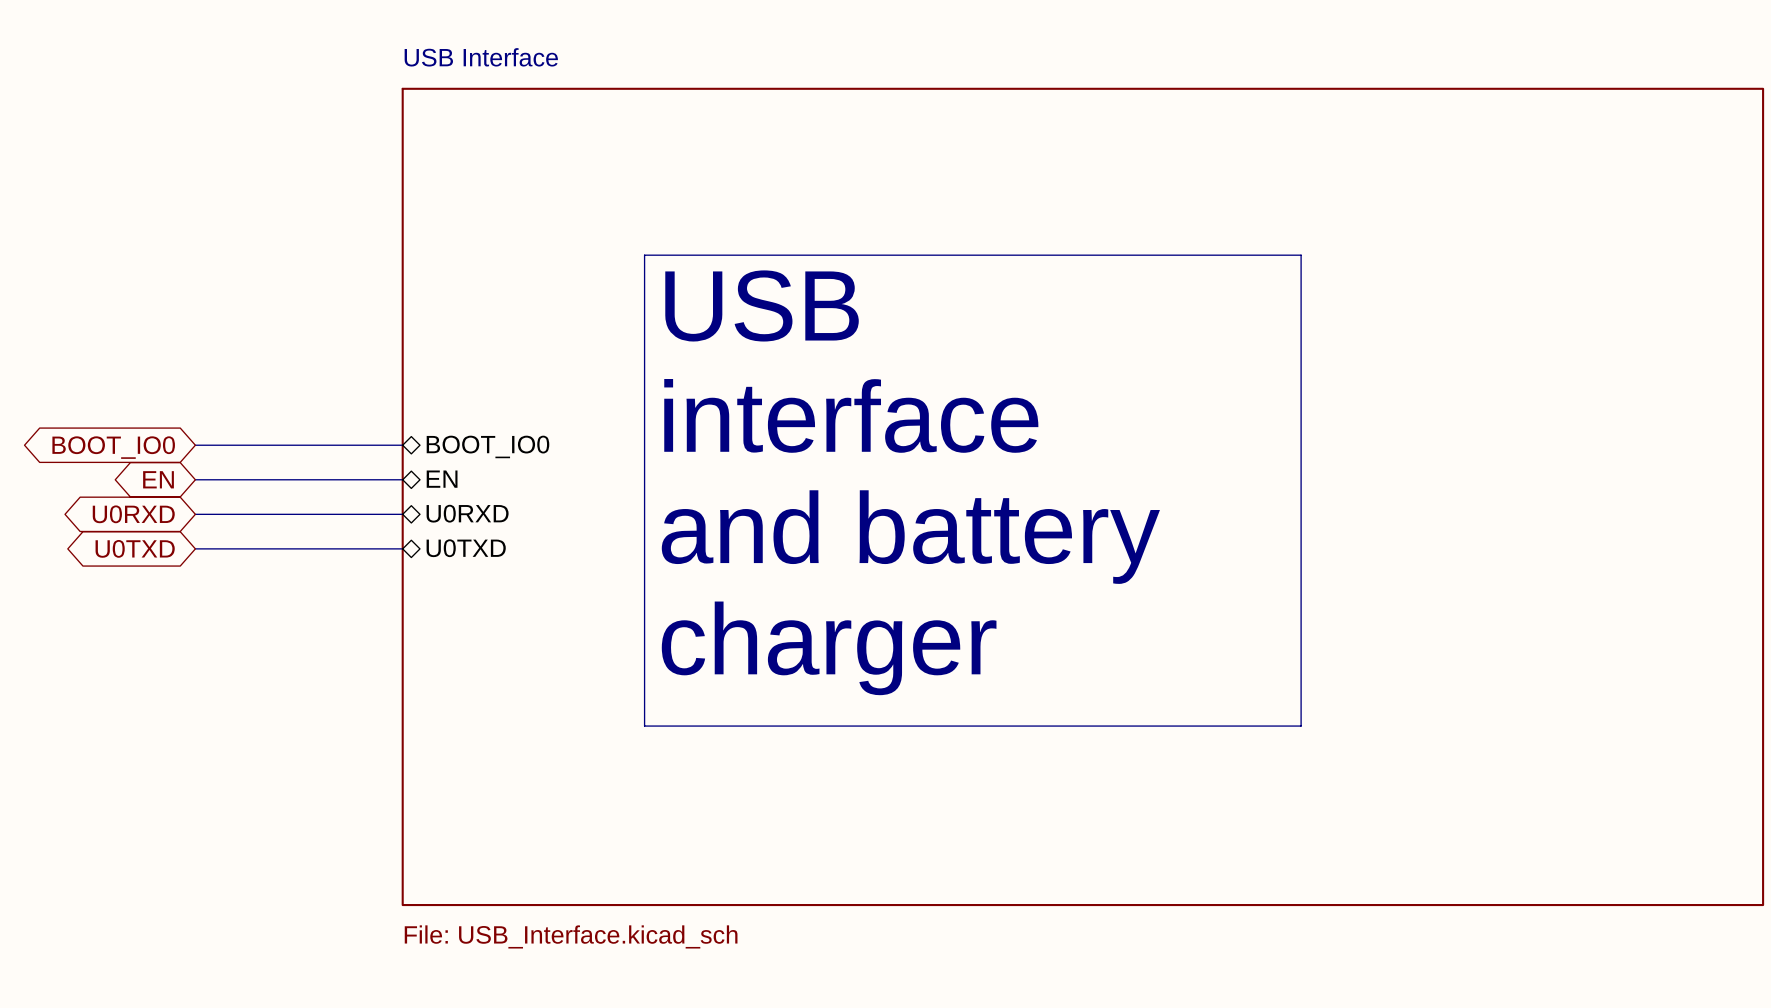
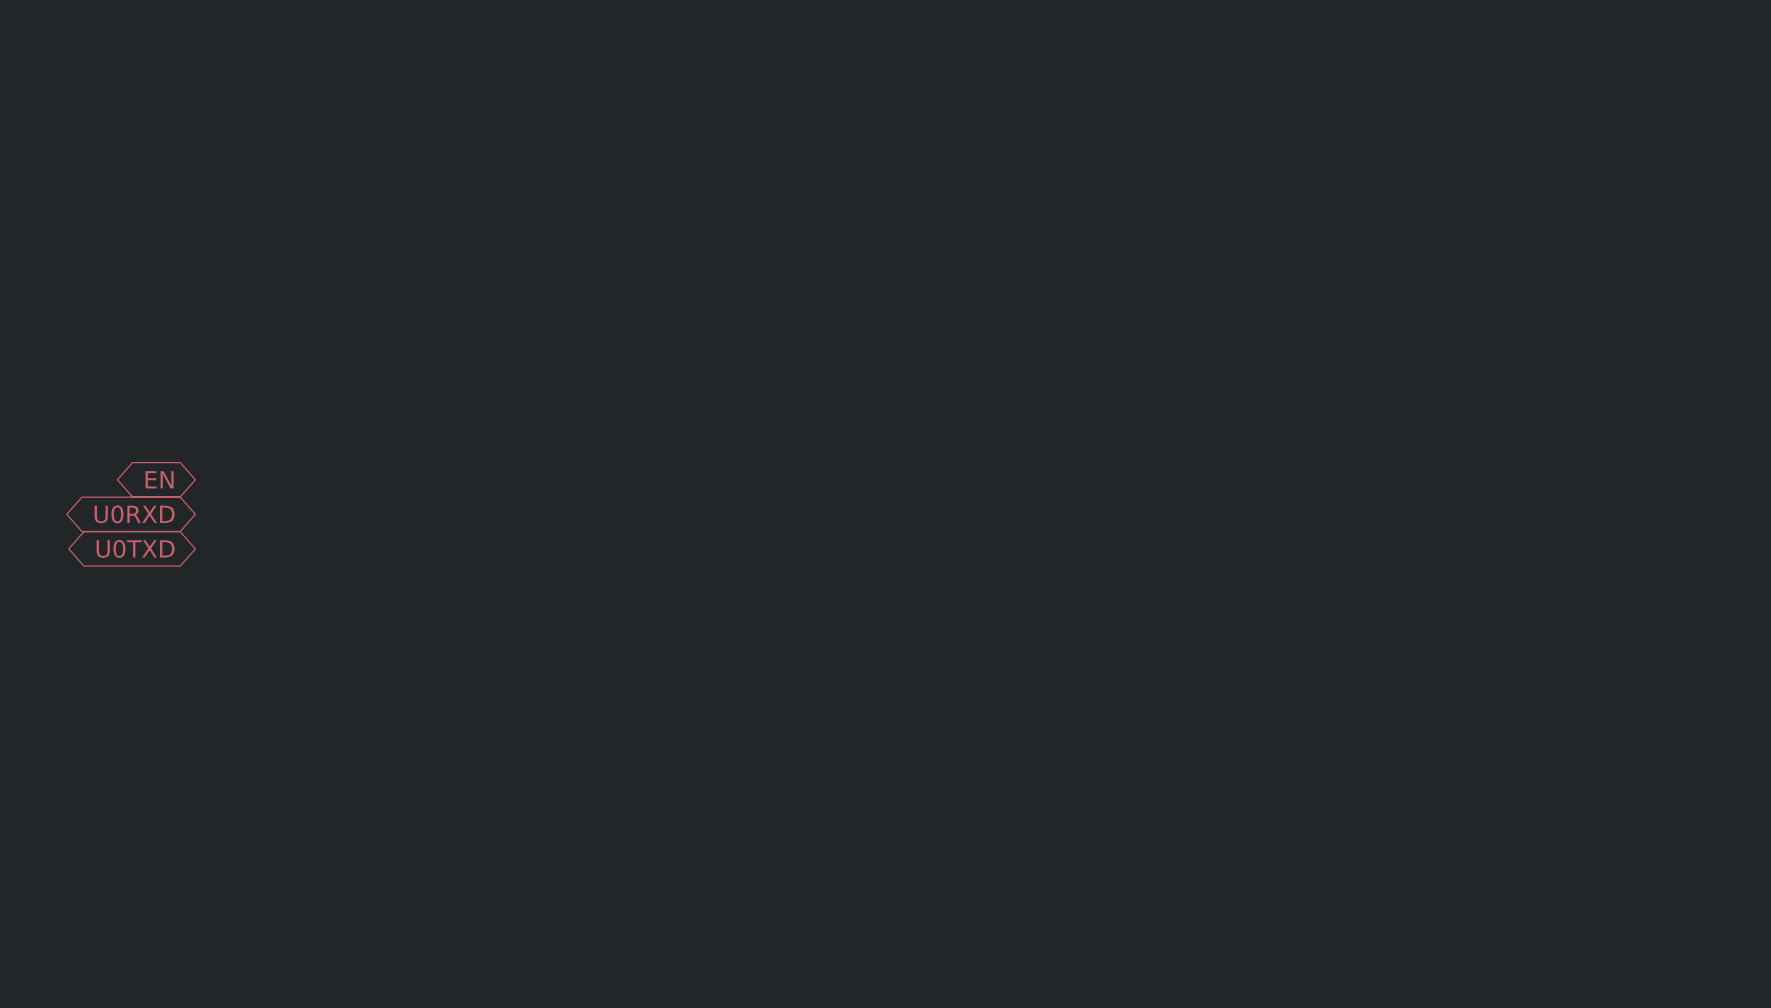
line: (644, 255) (1301, 255) (1301, 726) (644, 726) (644, 255) -> none
text: USB (762, 305) -> none
text: interface (851, 415) -> none
wire: (195, 445) (402, 445) -> none
sheet pin: BOOT_IO0 (487, 446) -> none
global label: BOOT_IO0 (113, 447) -> none
wire: (195, 479) (402, 479) -> none
sheet pin: EN (442, 479) -> none
sheet USB Interface: File: USB_Interface.kicad_sch (1082, 496) -> none
sheet pin: U0RXD (467, 513) -> none
wire: (195, 514) (402, 514) -> none
text: and battery (910, 537) -> none
wire: (195, 548) (402, 548) -> none
sheet pin: U0TXD (466, 548) -> none
text: charger (829, 648) -> none

